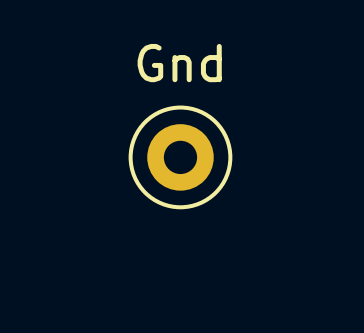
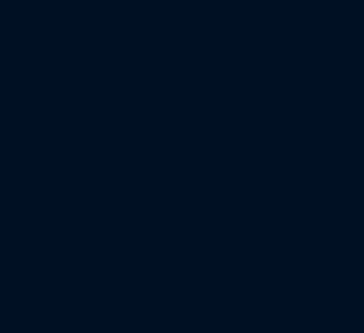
part: Gnd (180, 157) -> none

